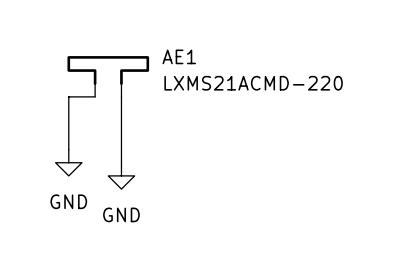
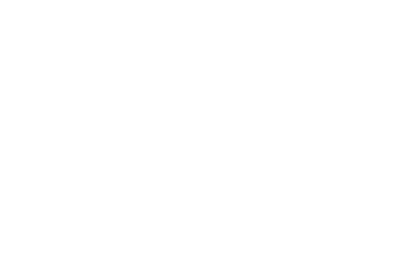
AE1: LXMS21ACMD-220 (108, 76) -> none
wire: (95, 96) (68, 96) (68, 149) -> none
wire: (121, 96) (121, 162) -> none
power symbol: GND (68, 162) -> none
power symbol: GND (121, 175) -> none

